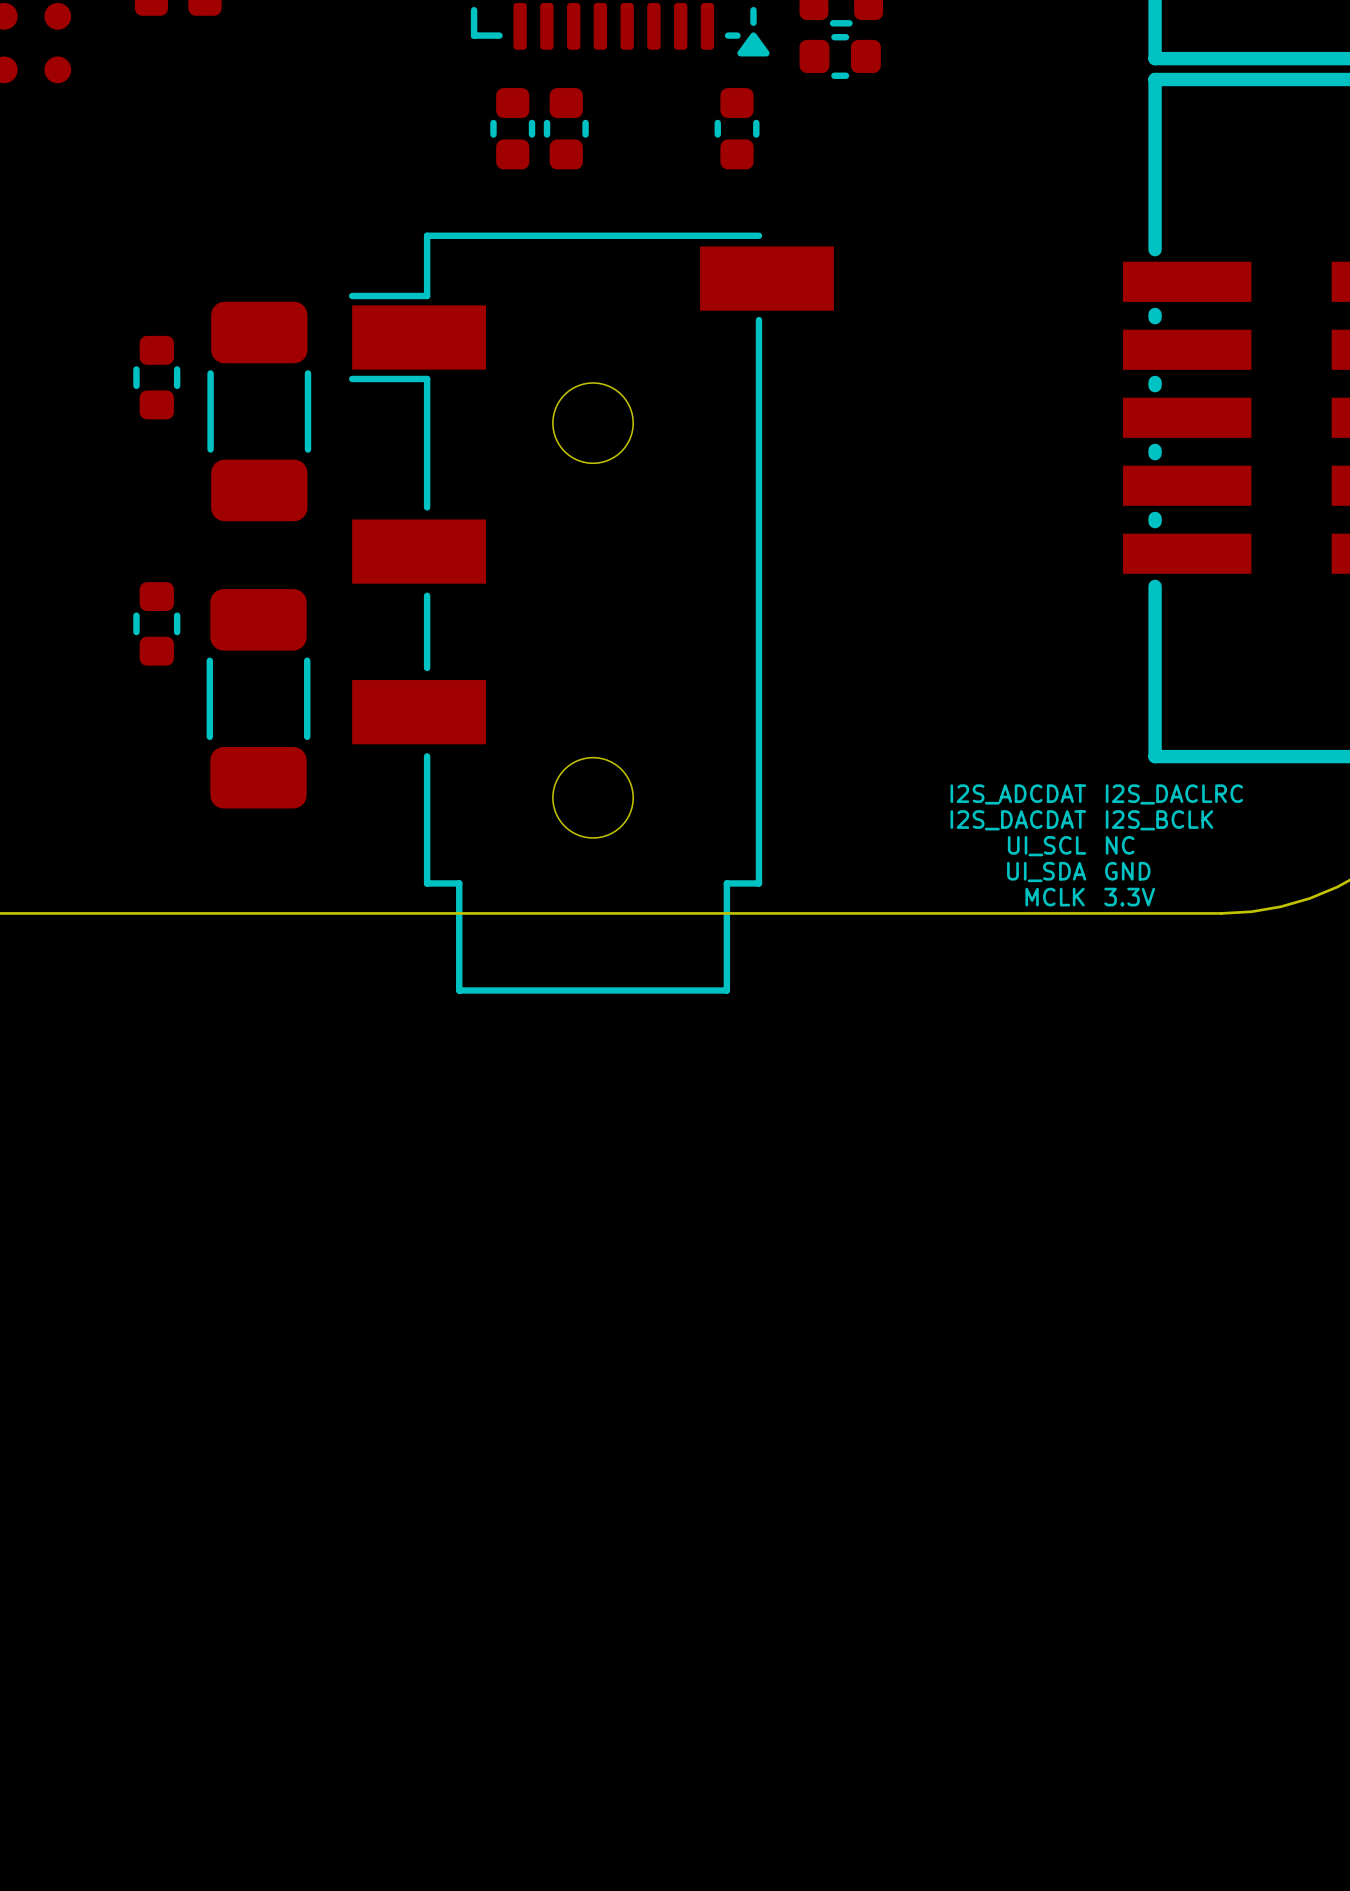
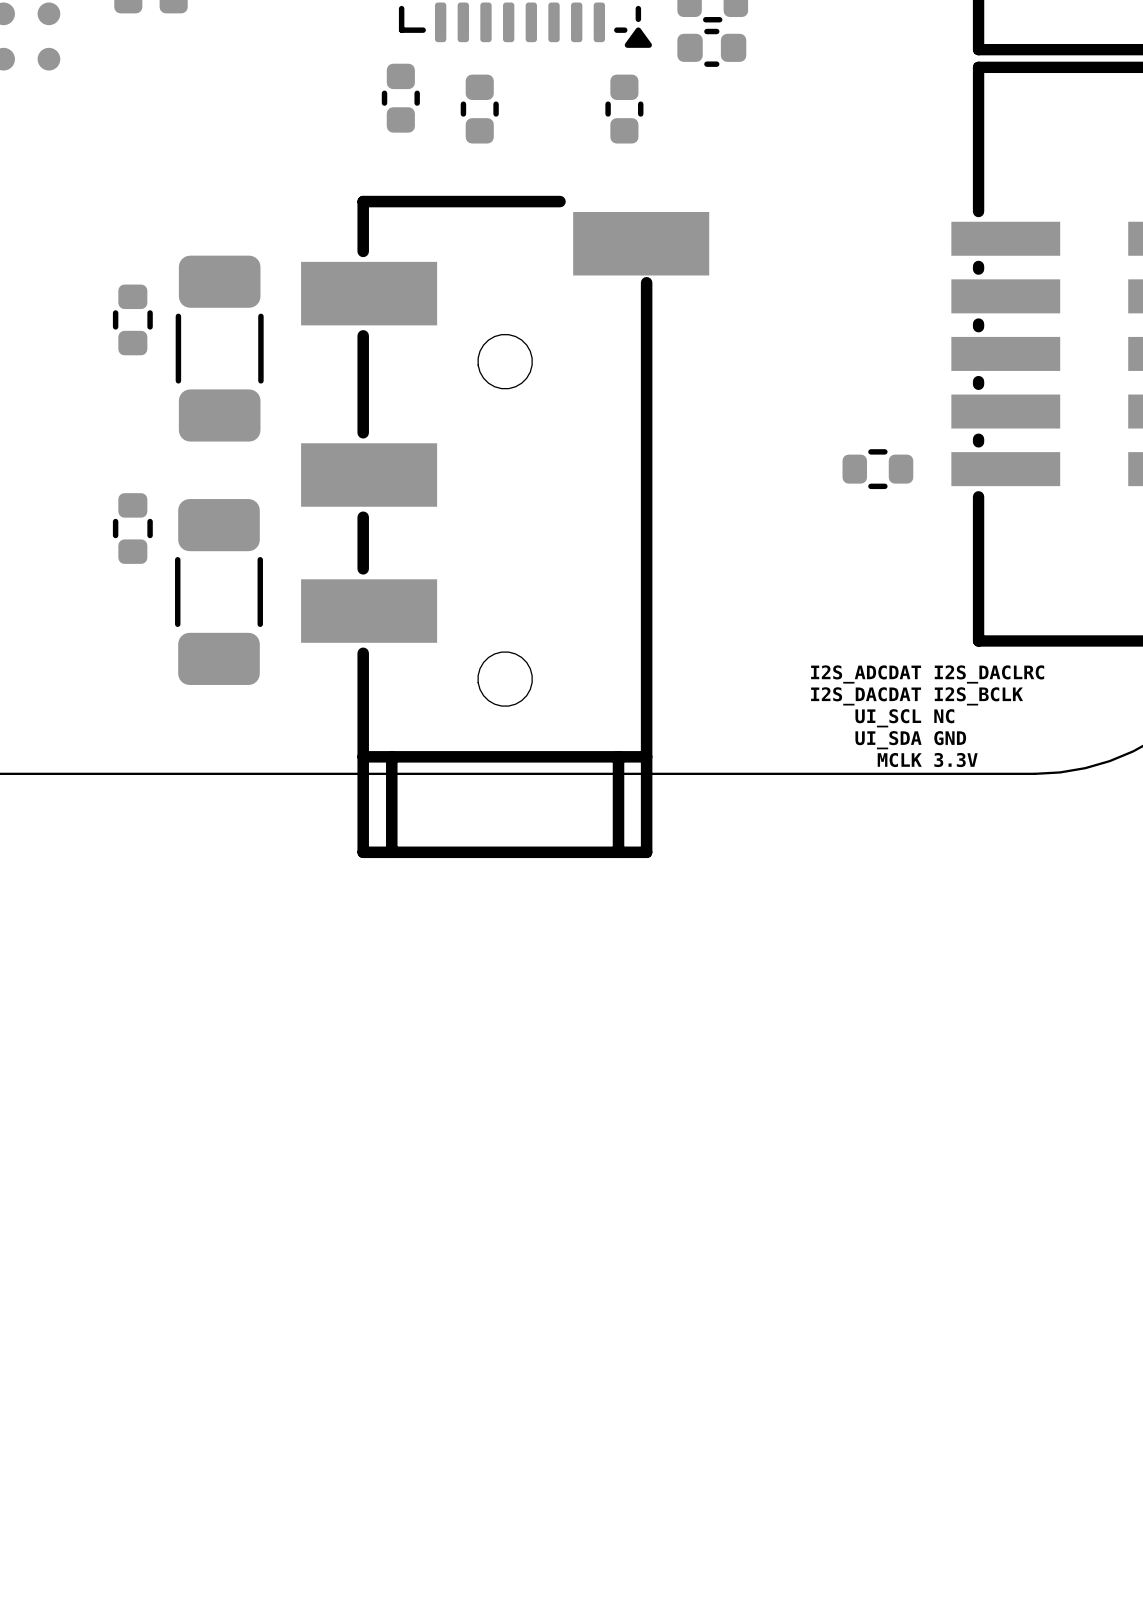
part position: (512, 128) -> (400, 98)
part footprint: [348, 232, 834, 994] -> [301, 195, 710, 859]
part: none -> (877, 469)

